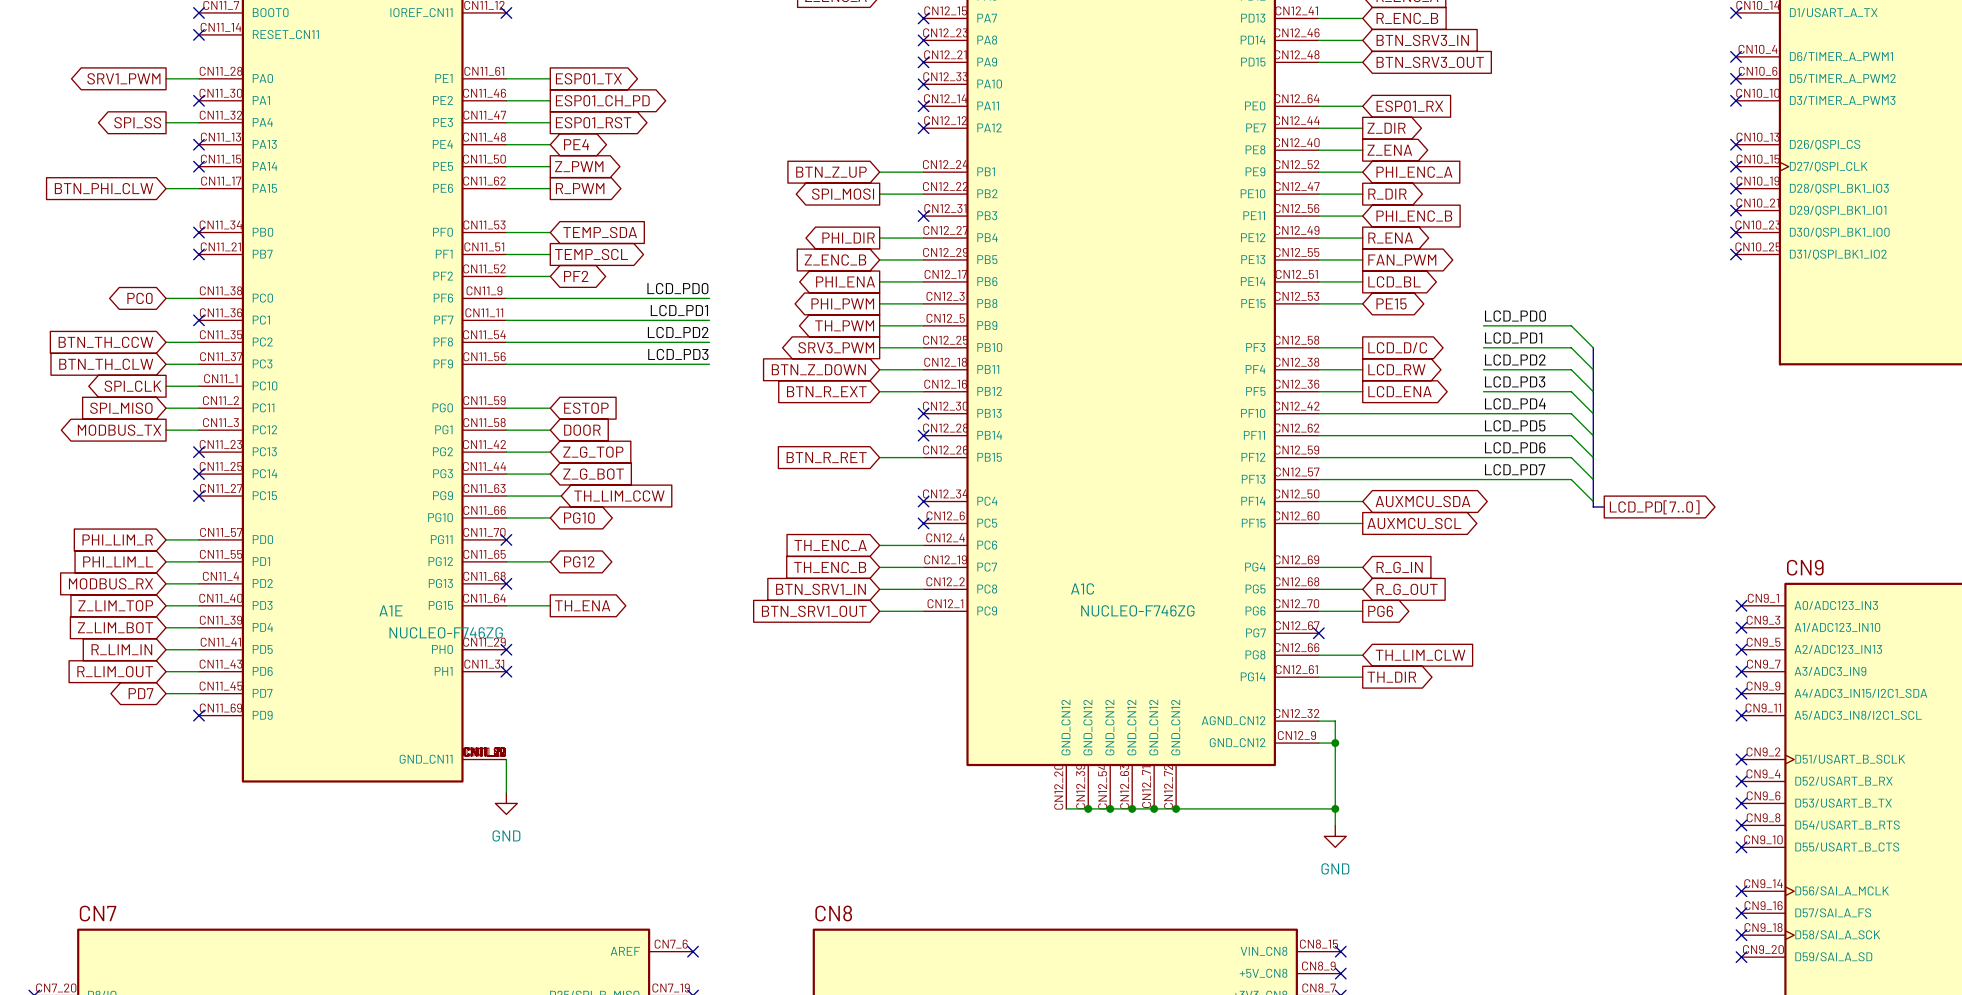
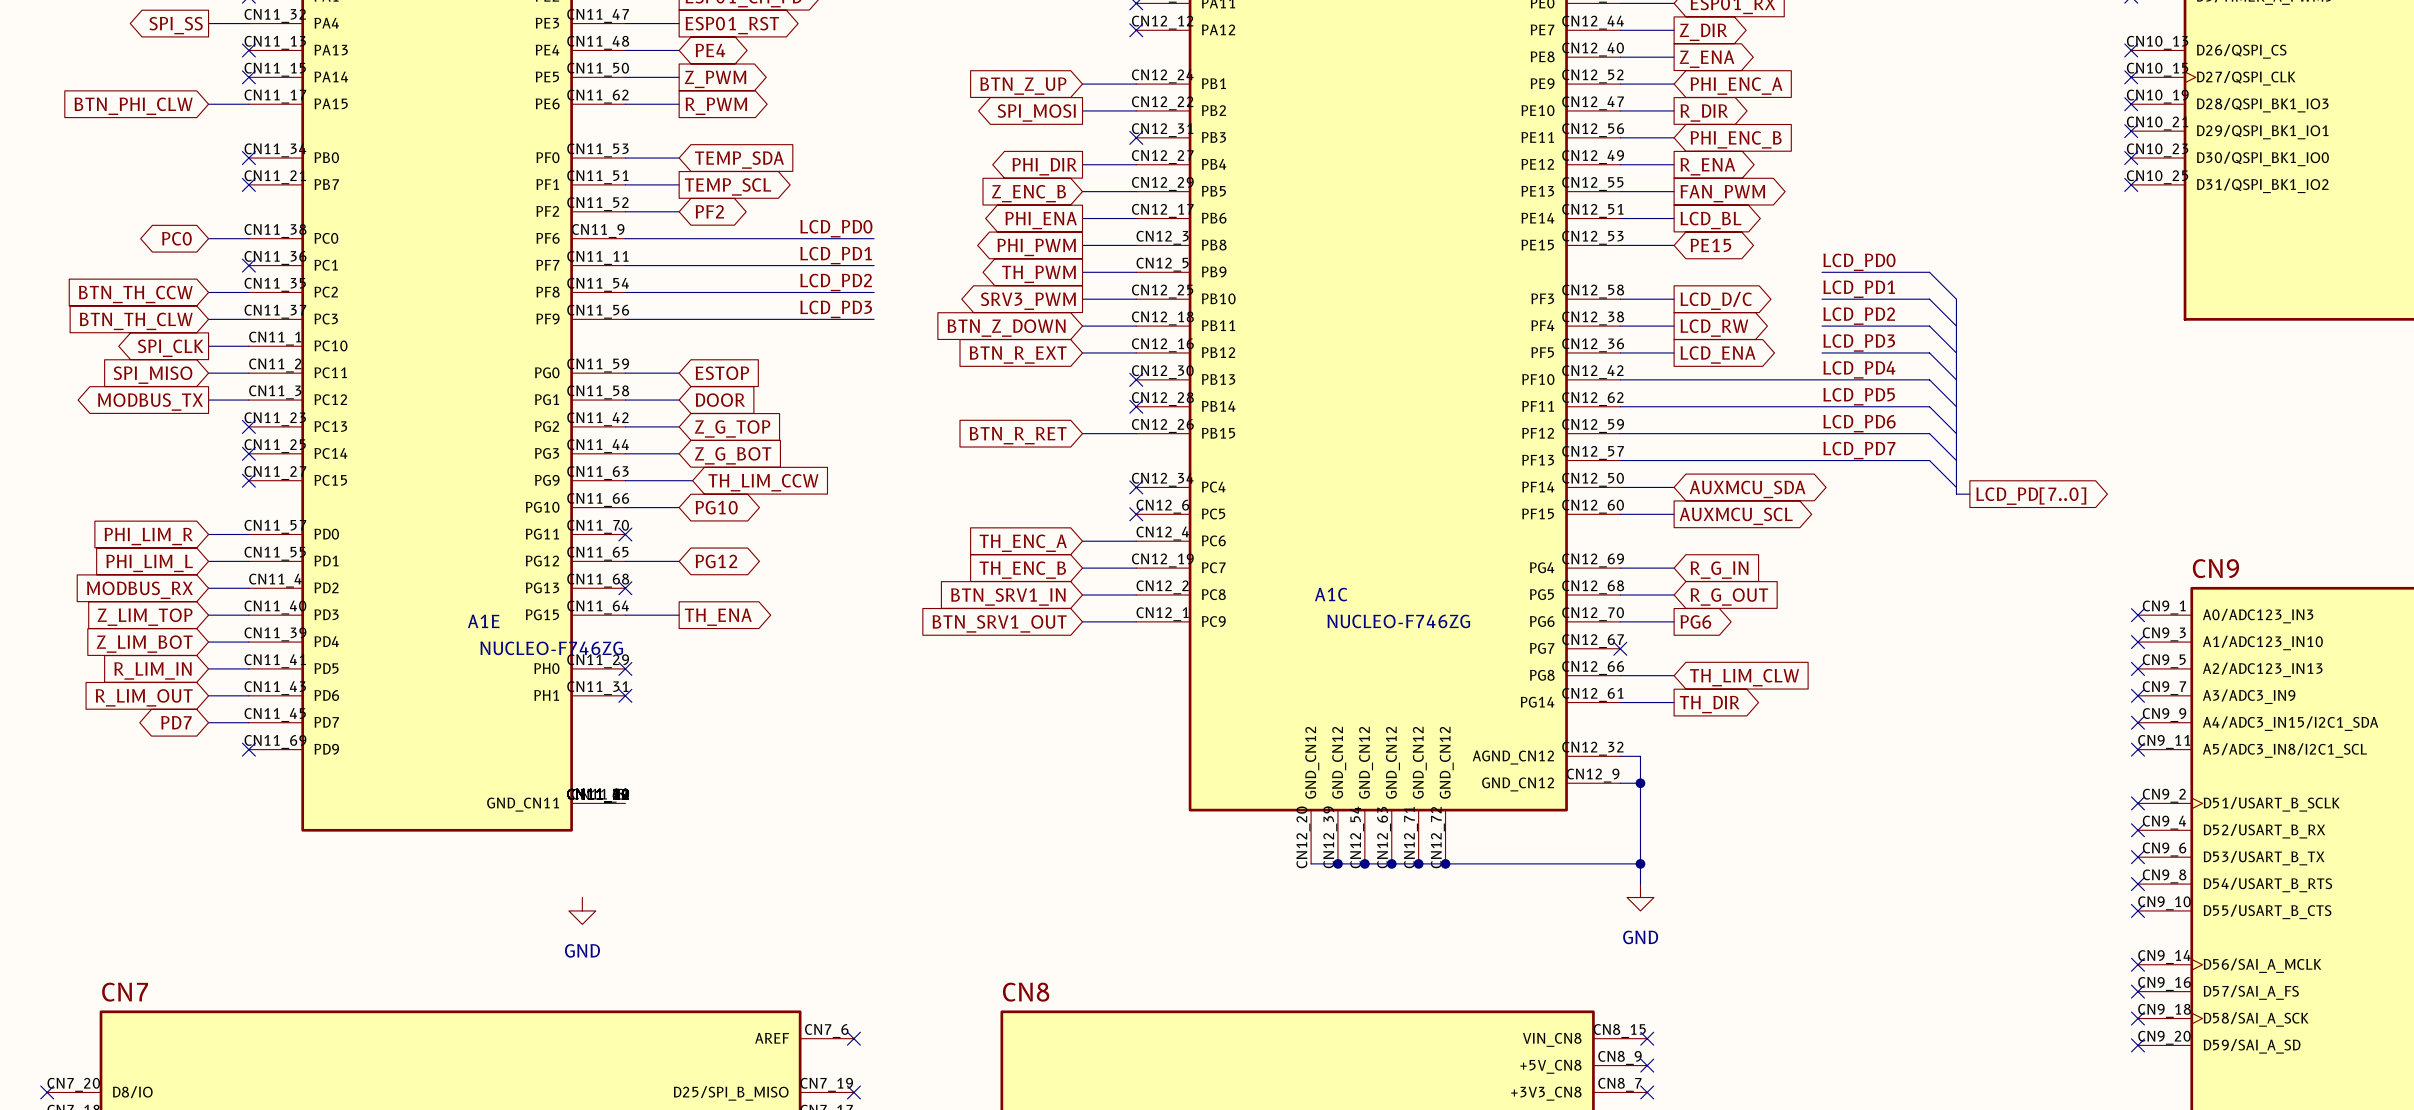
wire: (506, 759) (506, 792) -> none
power symbol position: GND (506, 803) -> GND (582, 910)

